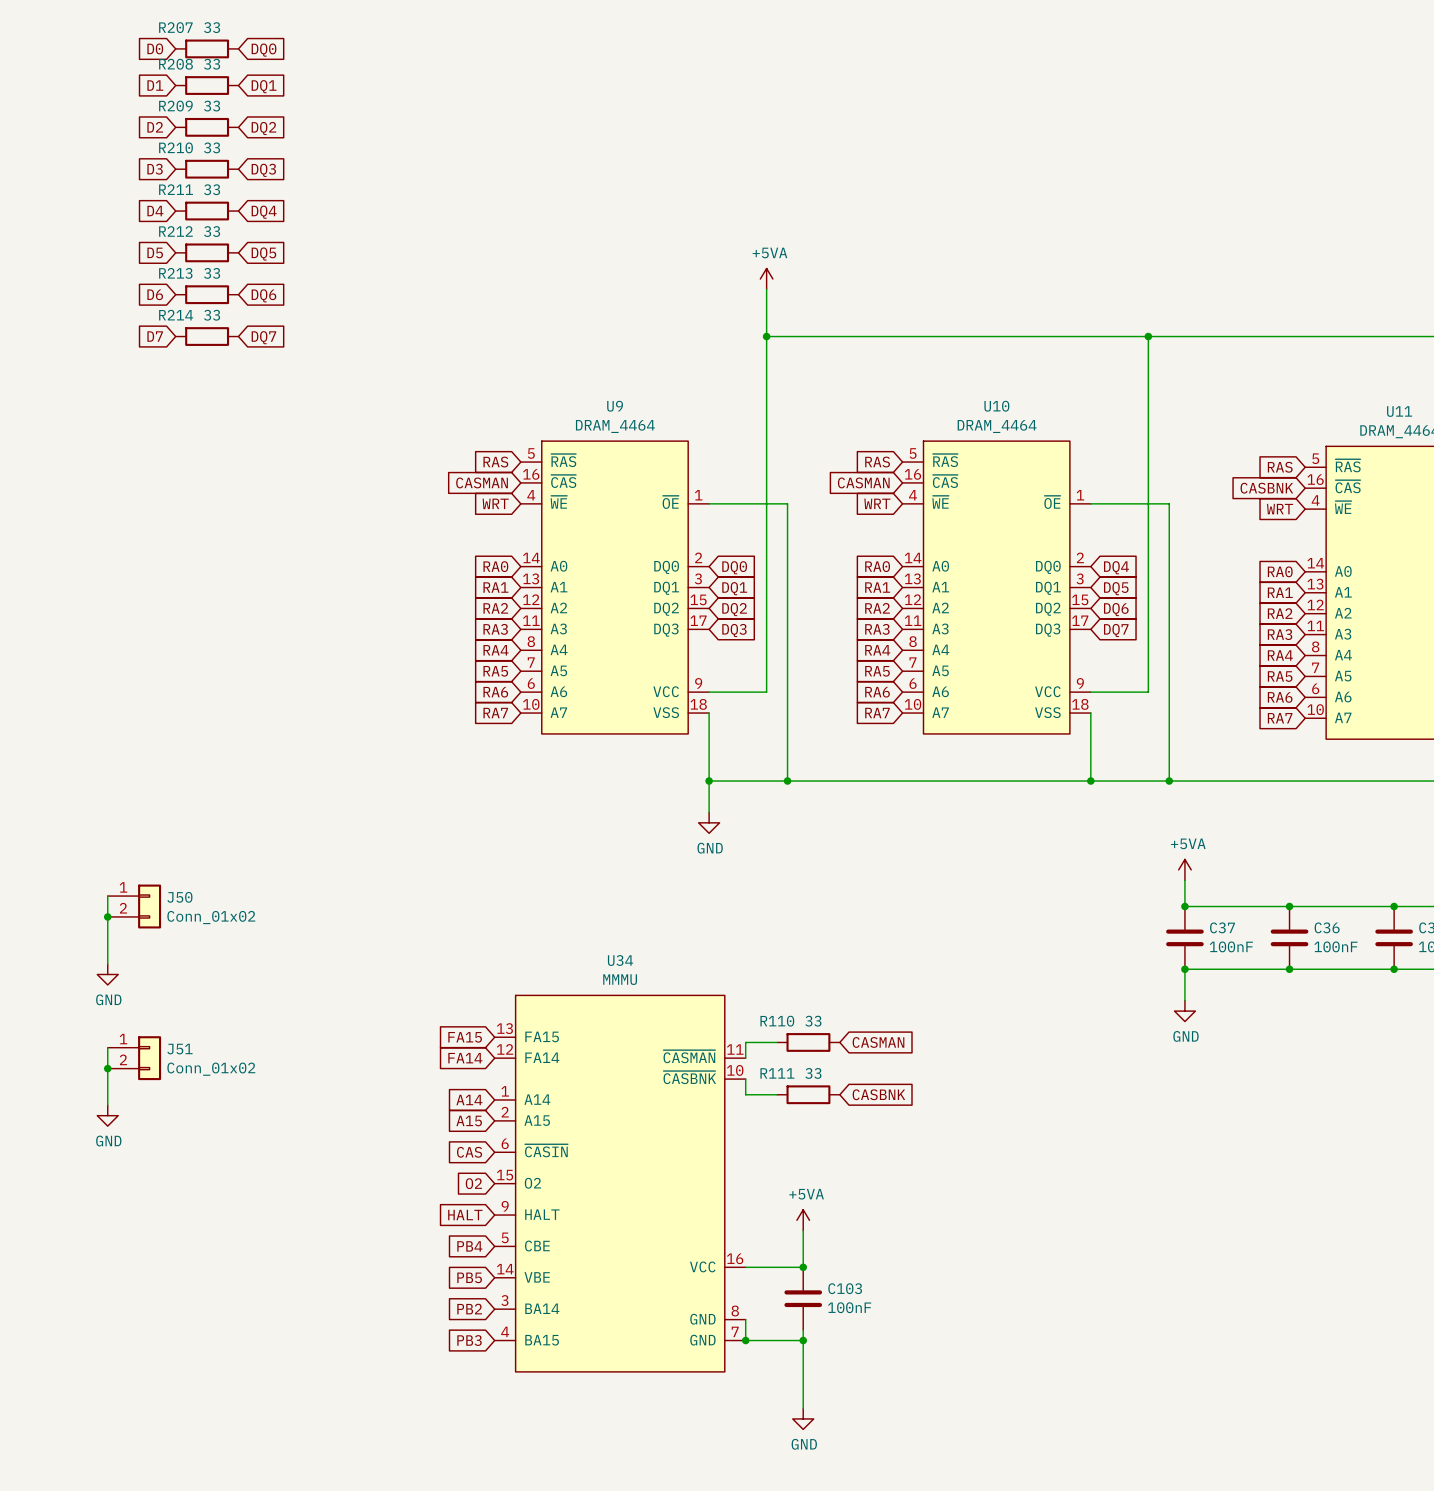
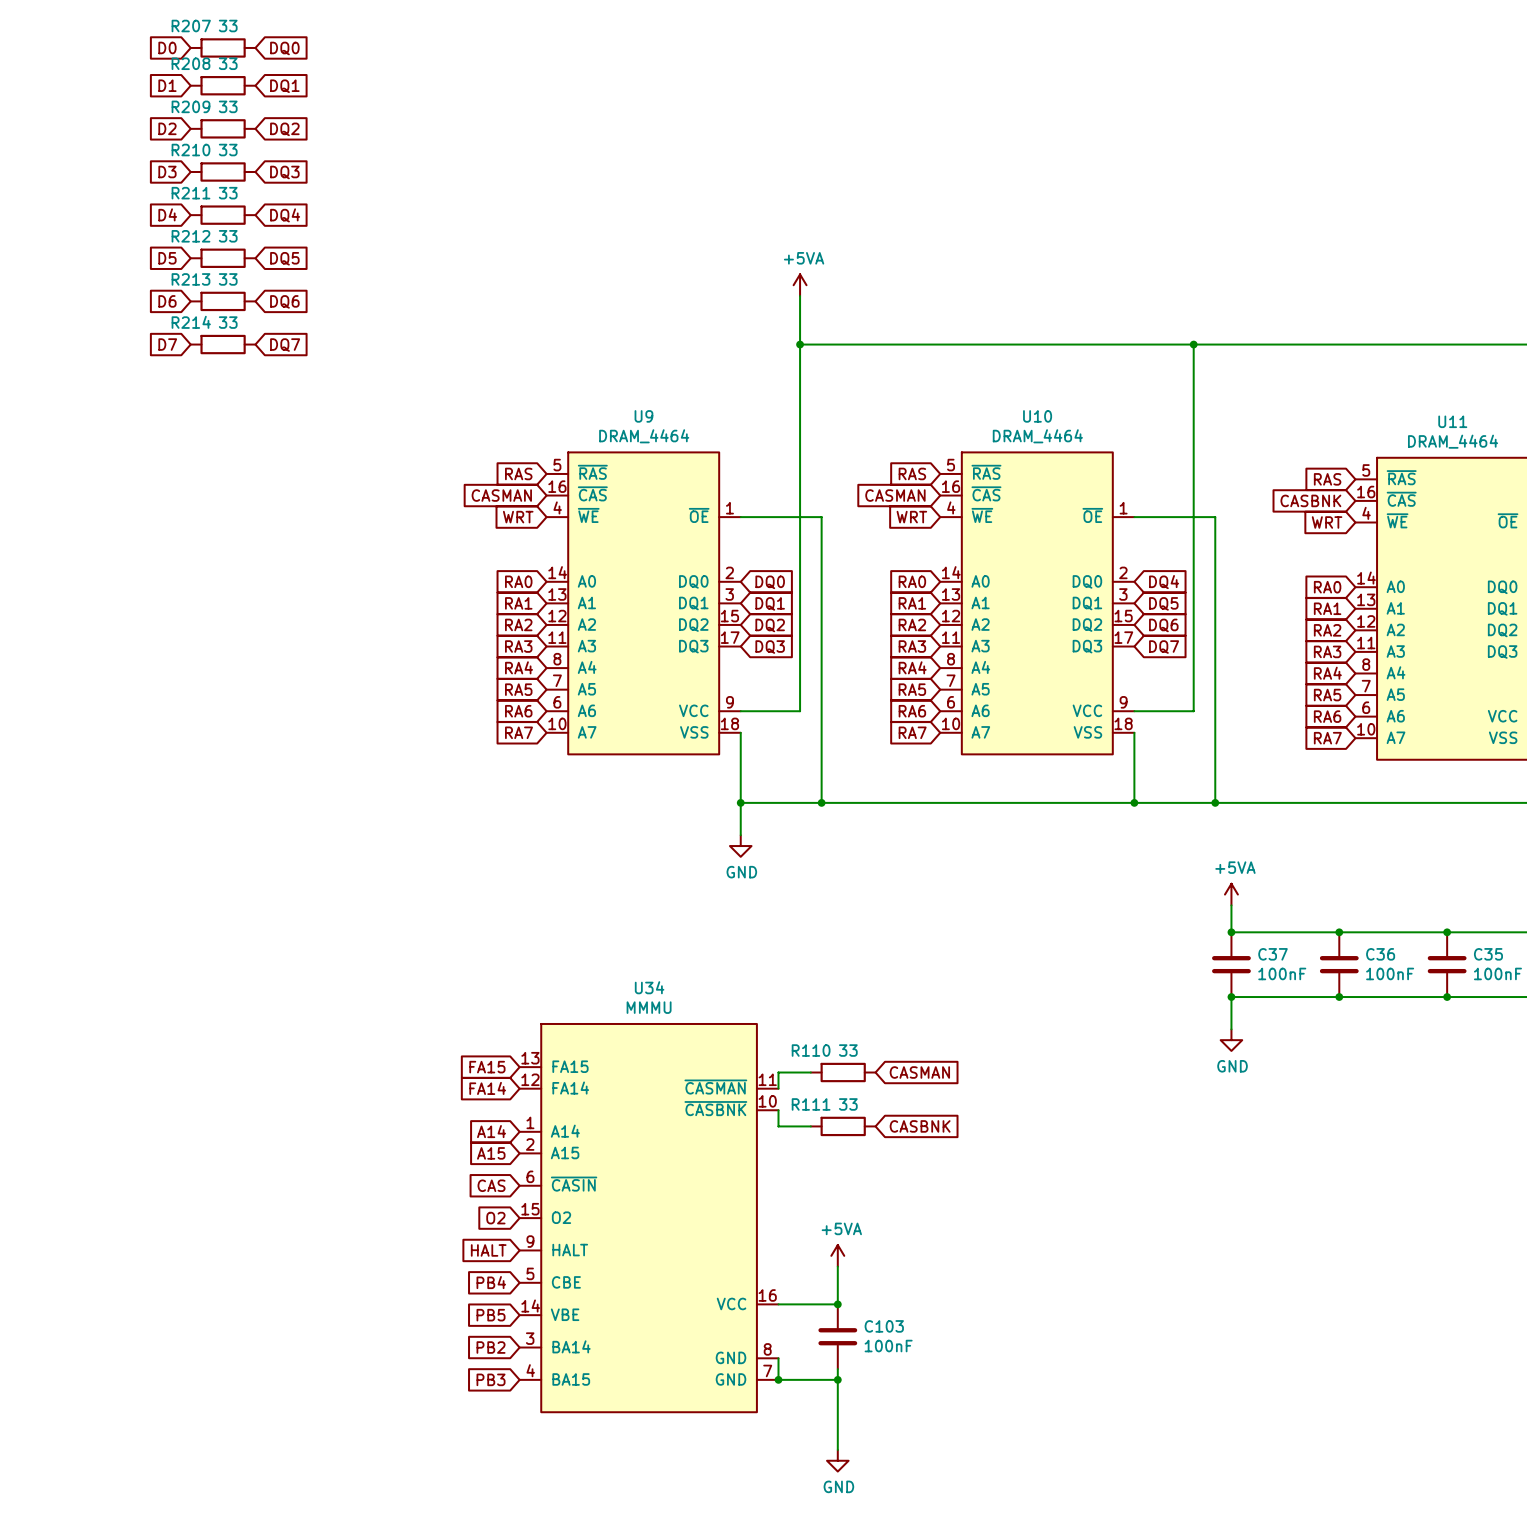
wire: (107, 896) (107, 964) -> none
J50: Conn_01x02 (134, 906) -> none
junction: (107, 916) -> none
power symbol: GND (107, 974) -> none
wire: (107, 1047) (107, 1105) -> none
J51: Conn_01x02 (134, 1058) -> none
junction: (107, 1068) -> none
power symbol: GND (107, 1115) -> none

